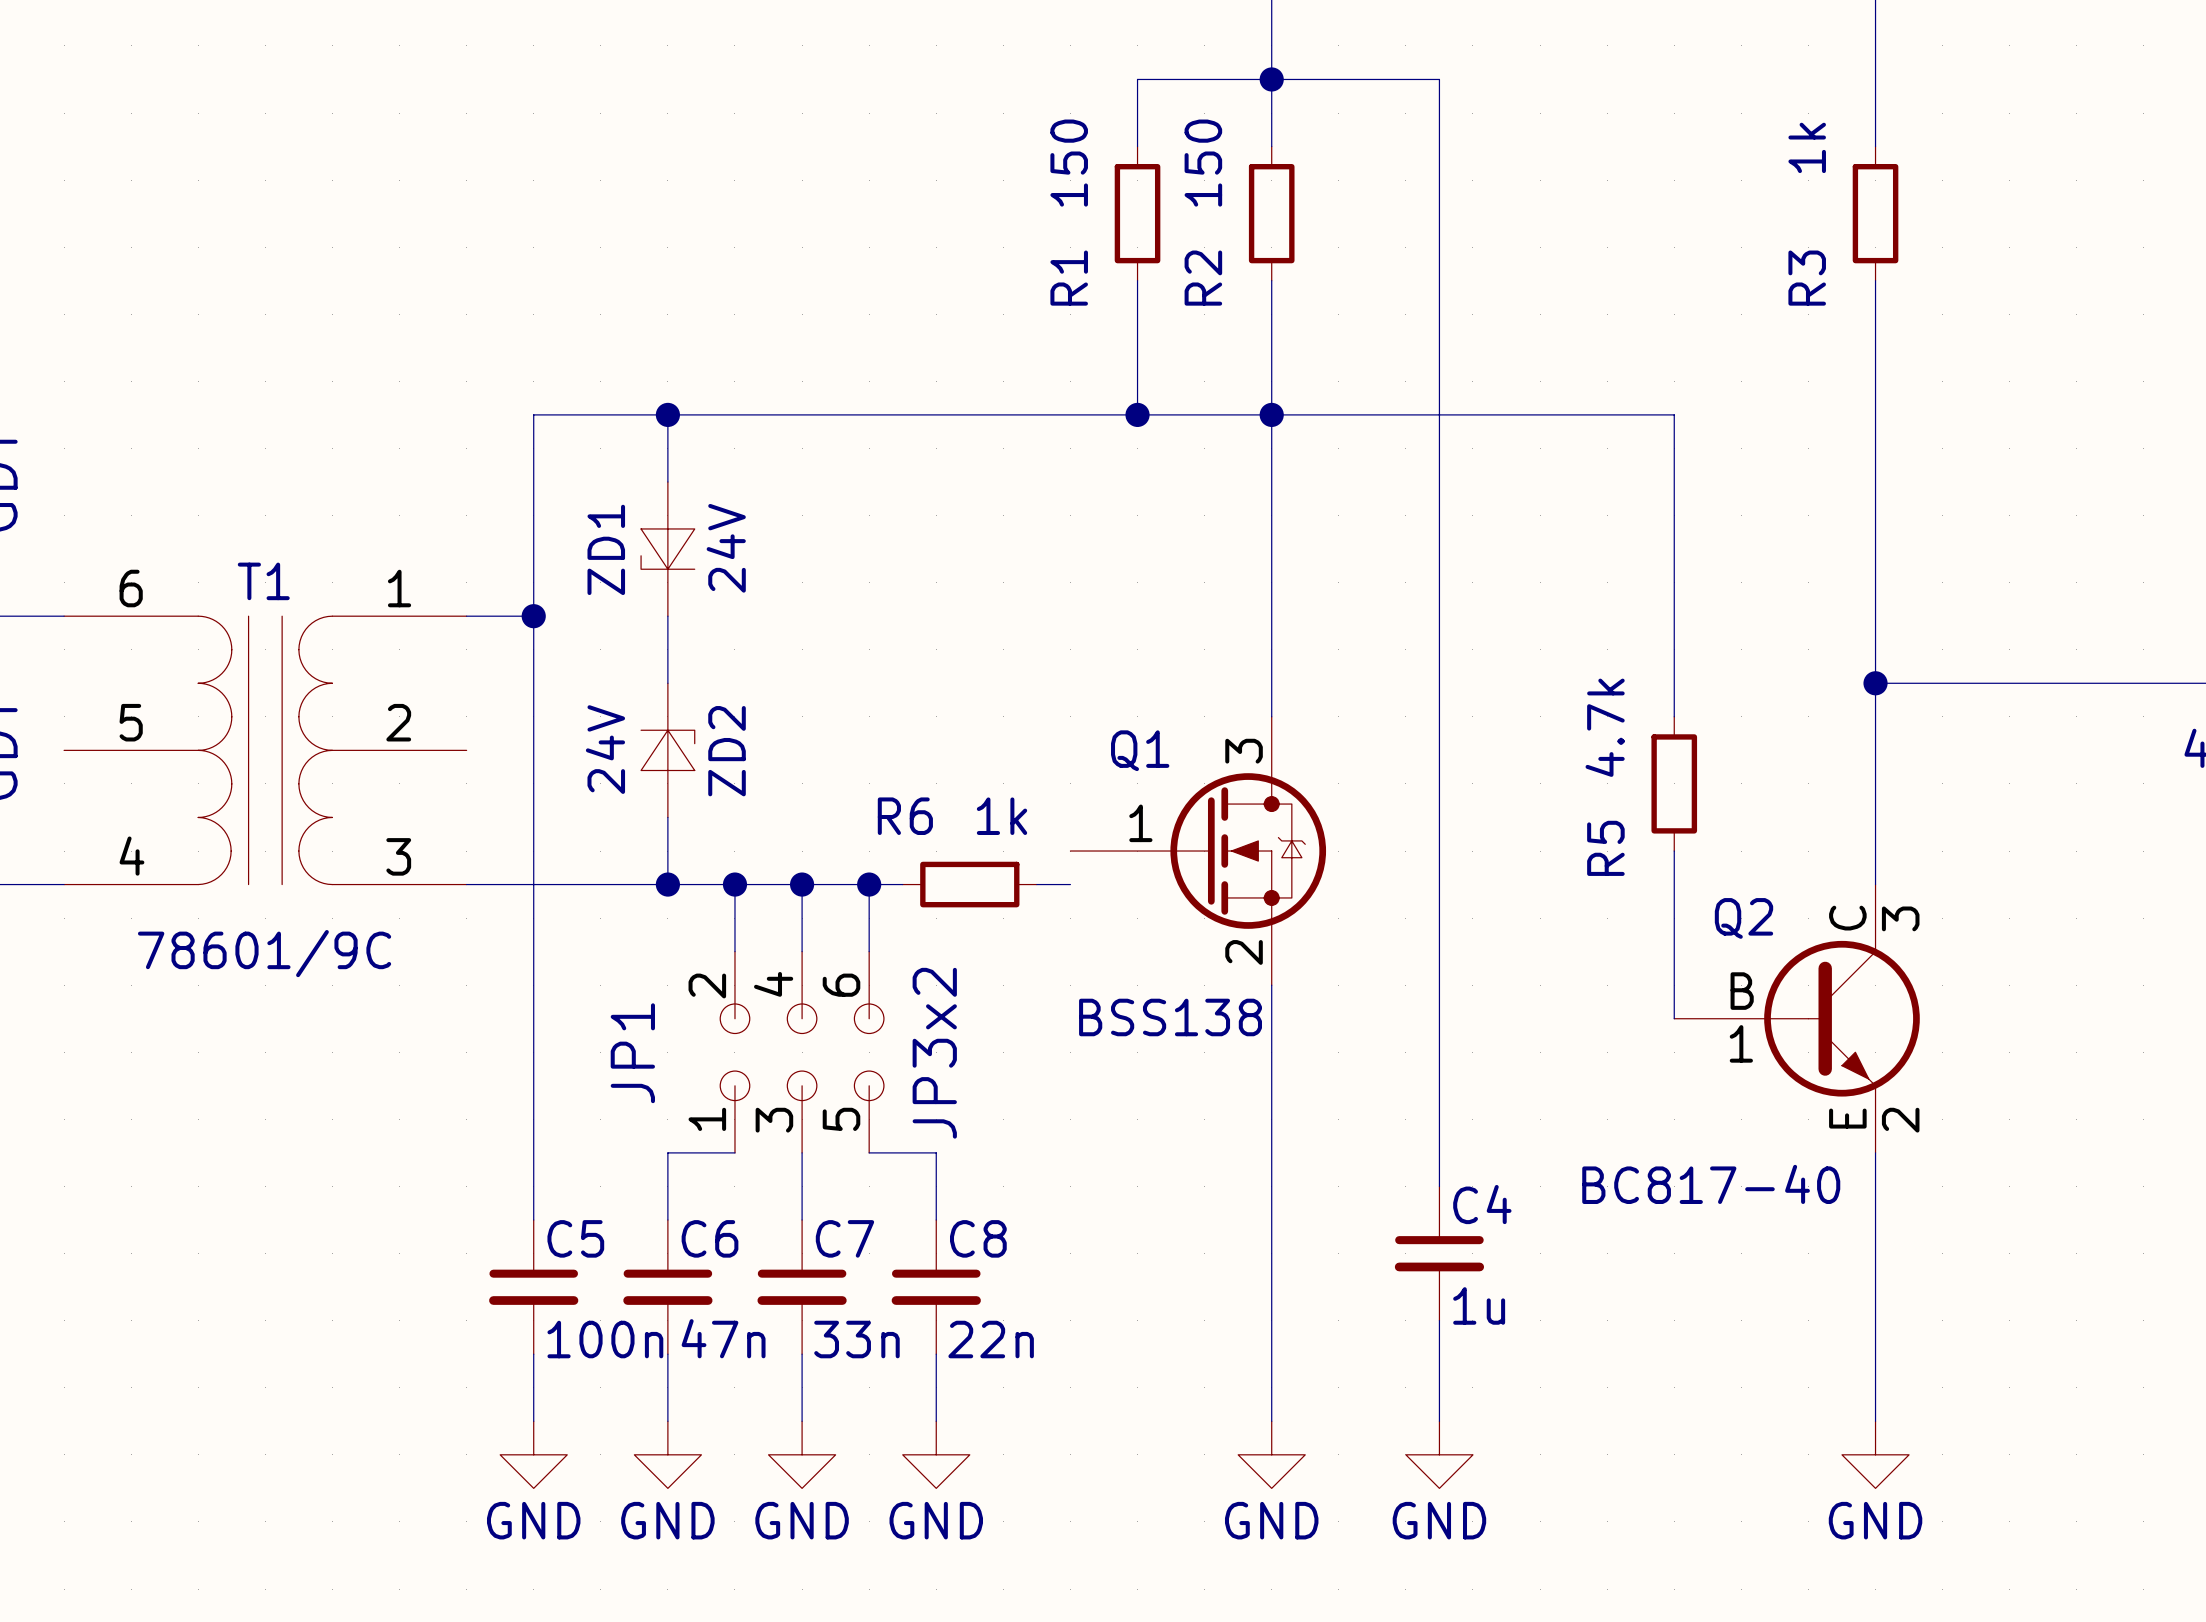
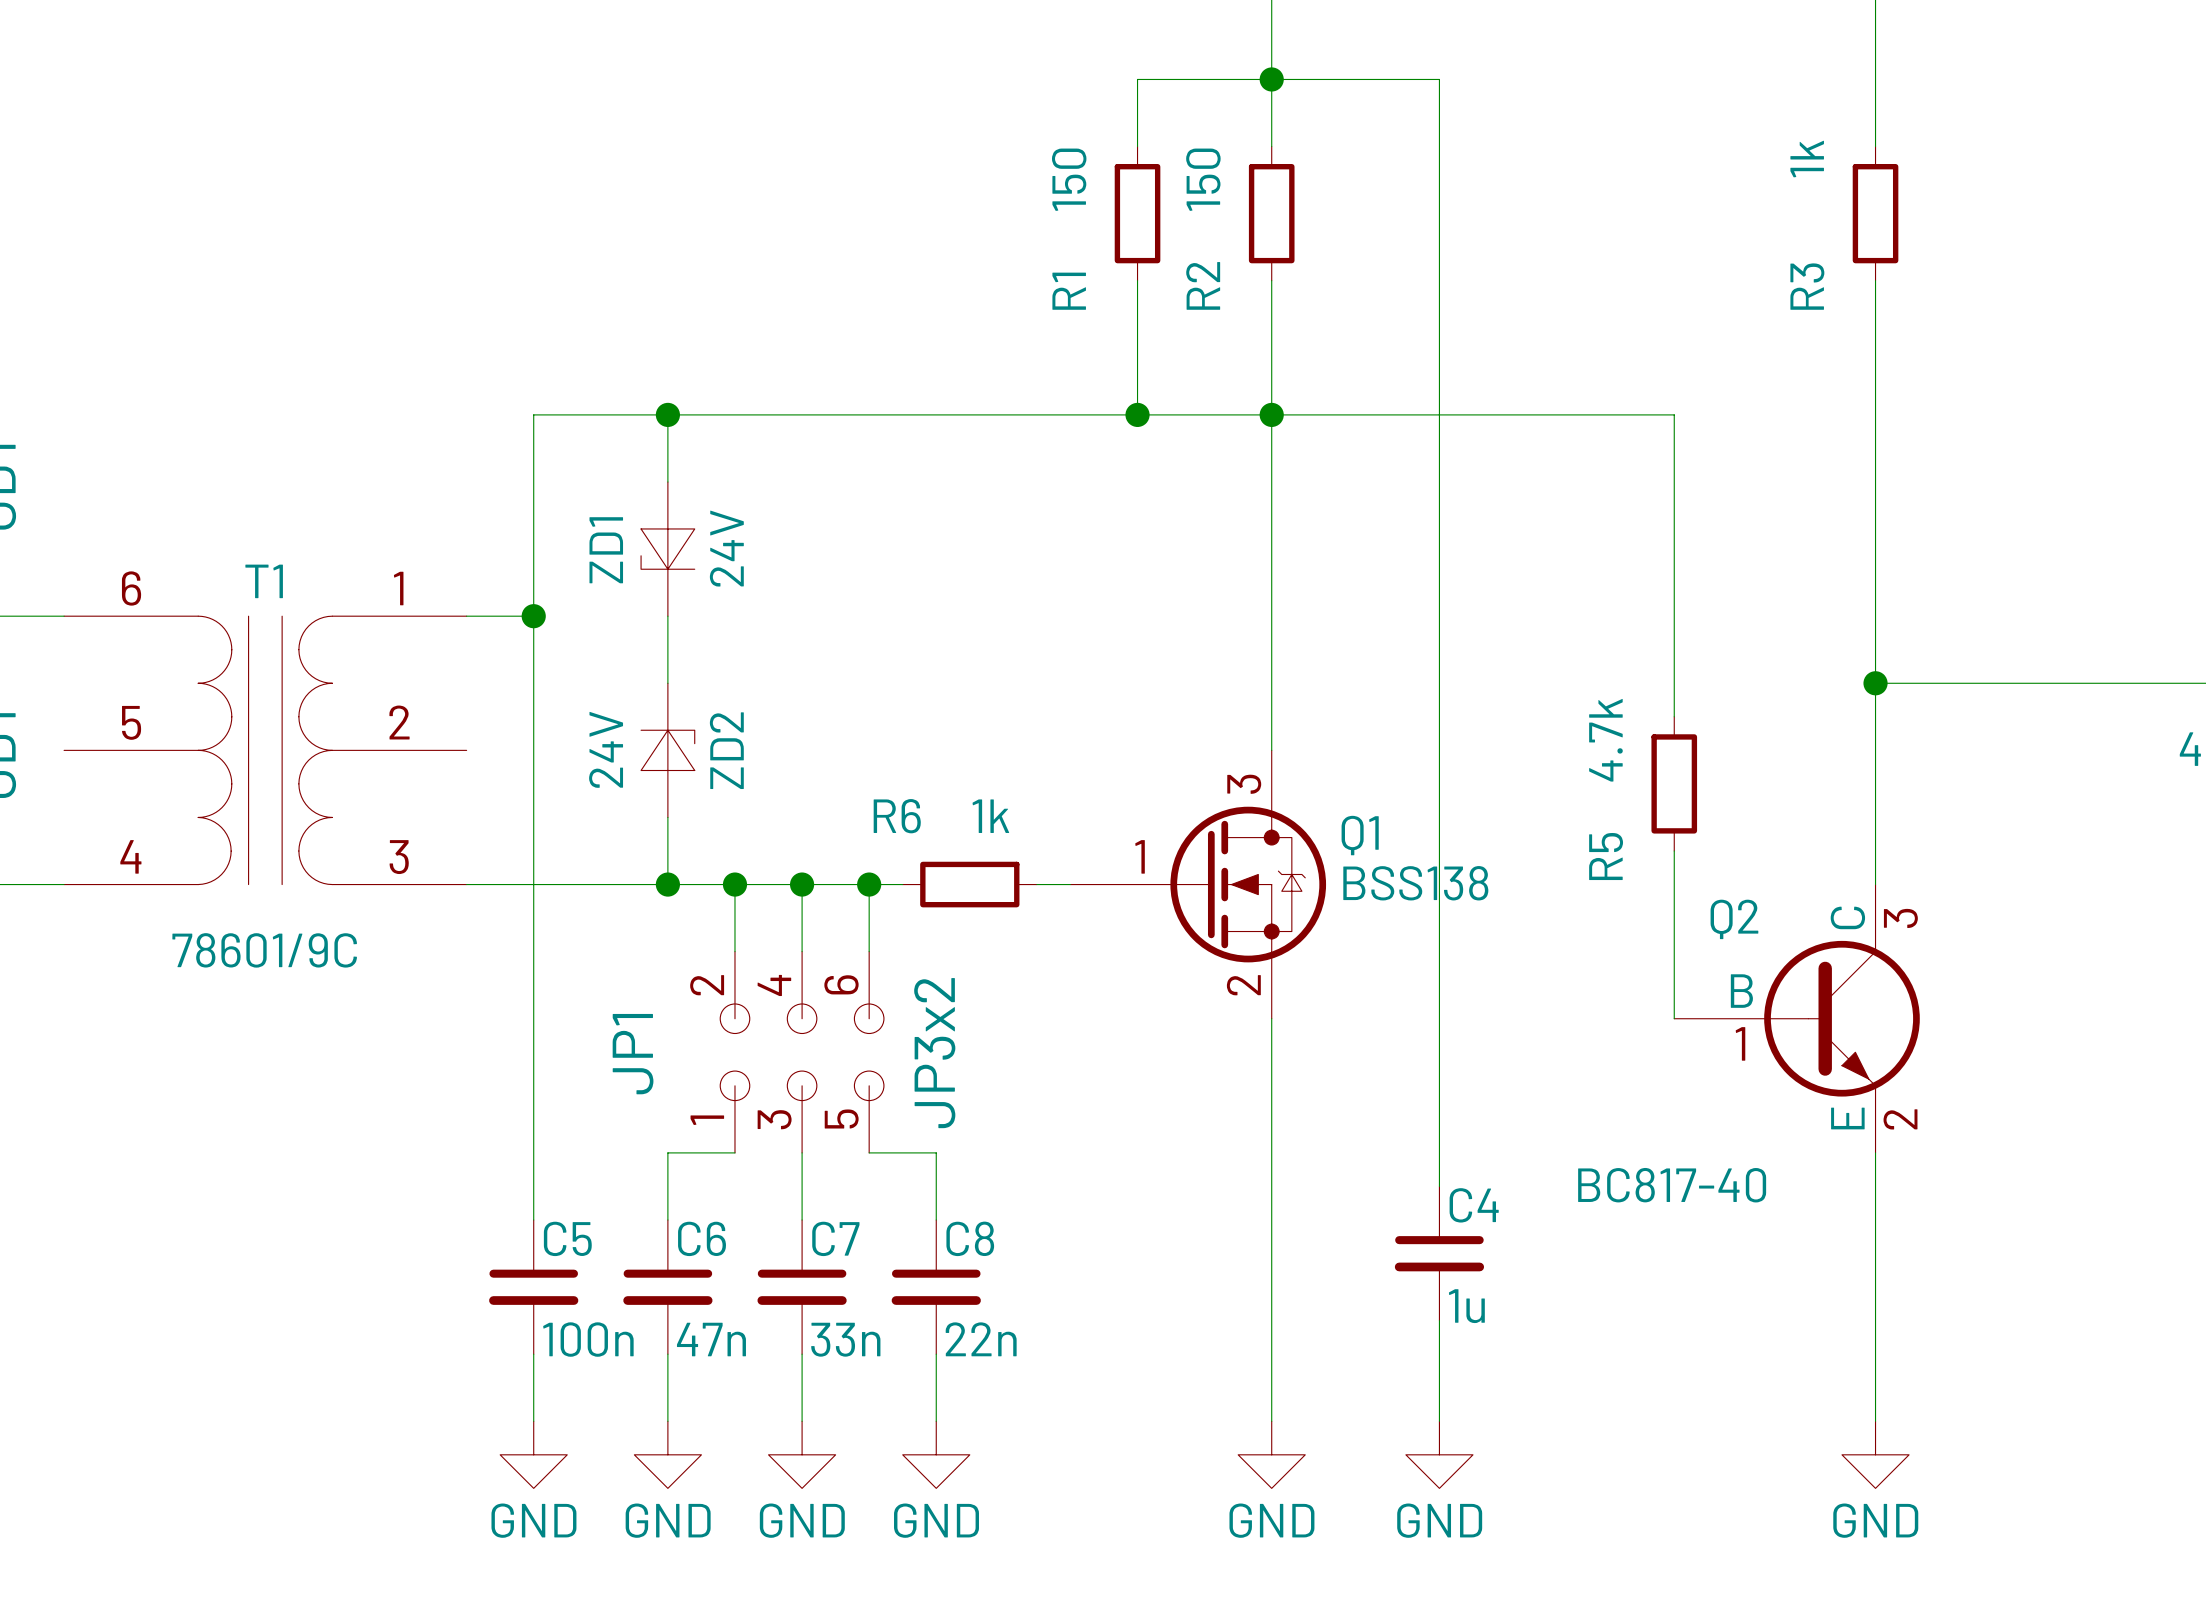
Q1 name position: Q1 (1140, 750) -> Q1 (1360, 835)
Q1 position: (1198, 851) -> (1198, 884)
Q1 value position: BSS138 (1170, 1017) -> BSS138 (1415, 883)

